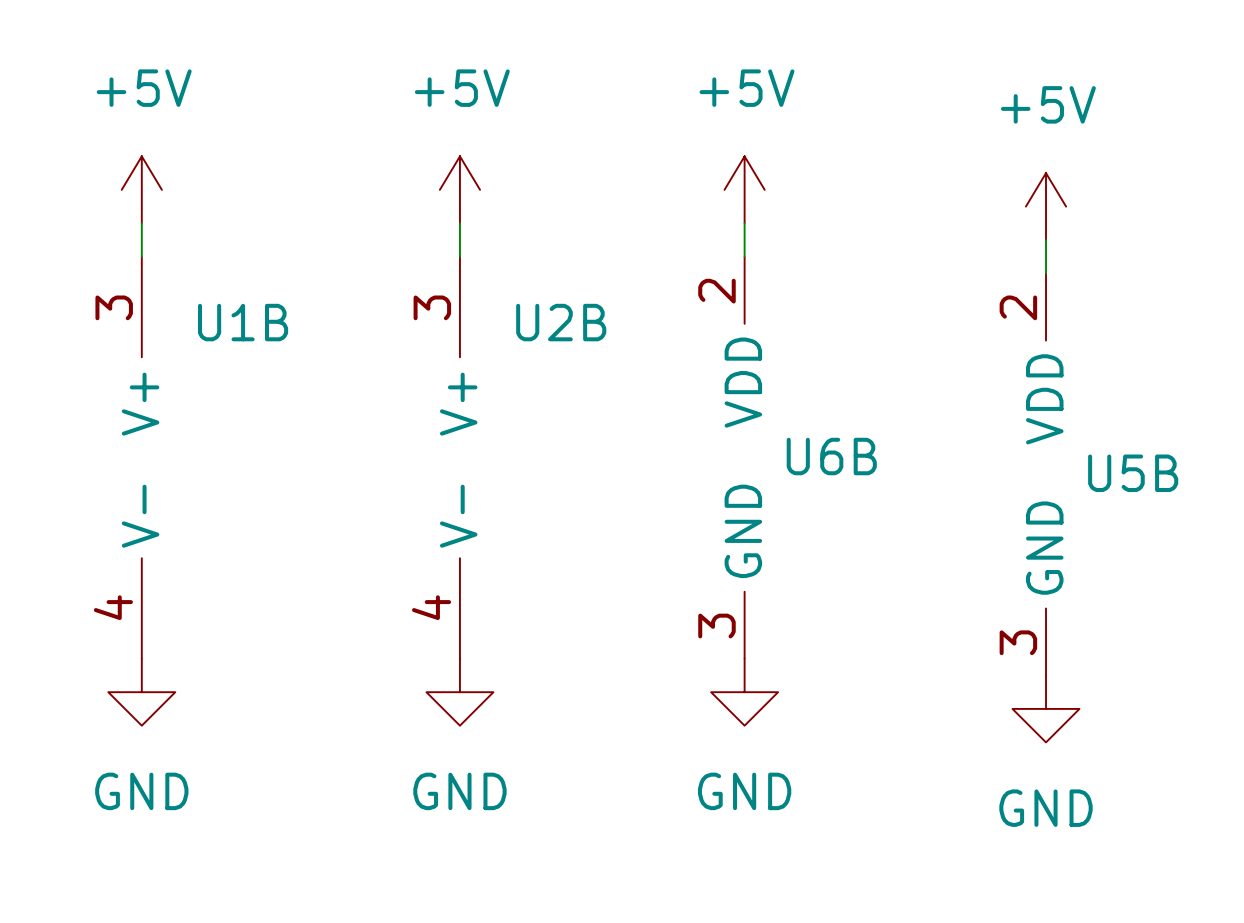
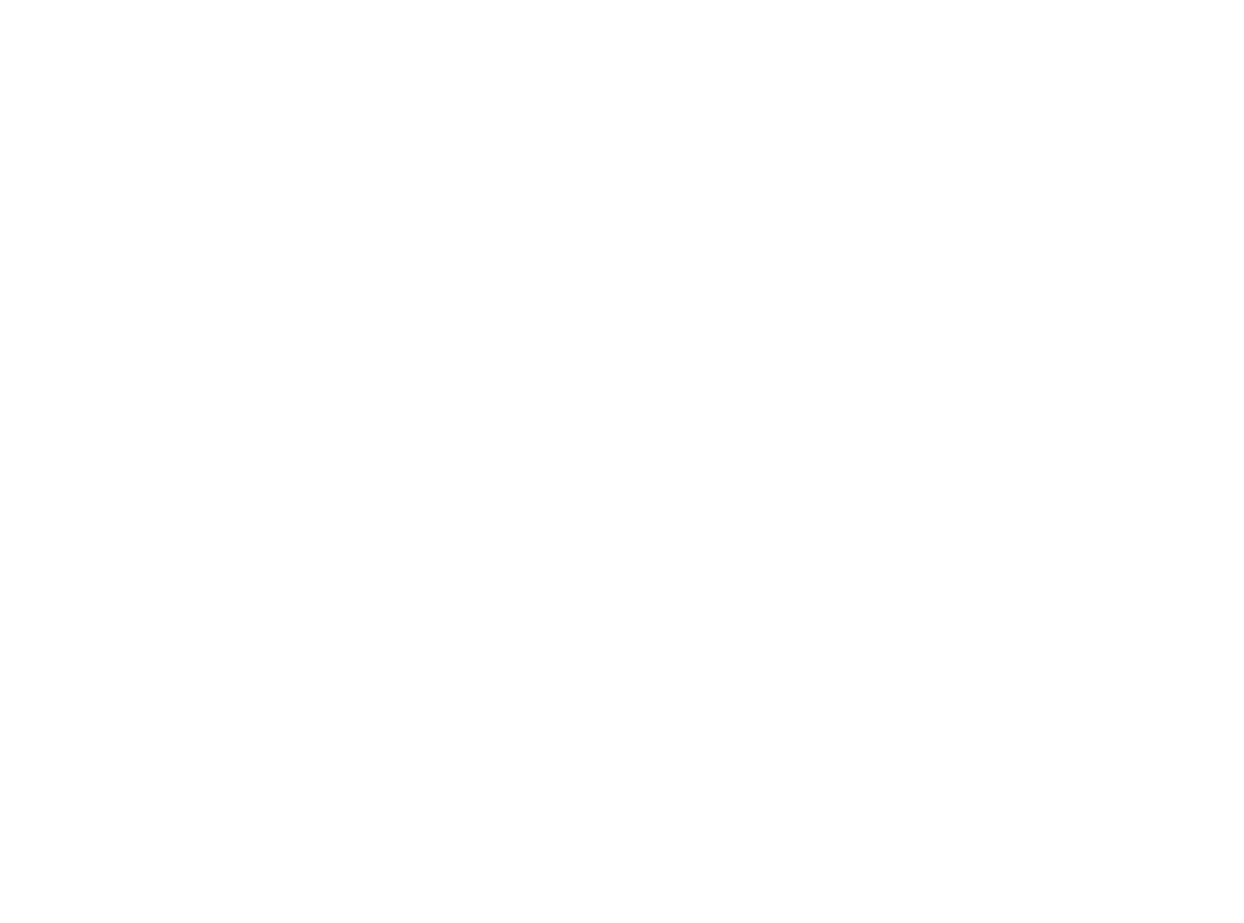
power symbol: +5V (141, 189) -> none
power symbol: +5V (459, 189) -> none
power symbol: +5V (744, 189) -> none
power symbol: +5V (1046, 206) -> none
wire: (141, 223) (141, 256) -> none
wire: (459, 223) (459, 256) -> none
wire: (744, 223) (744, 256) -> none
wire: (1046, 240) (1046, 273) -> none
U1B: (141, 457) -> none
U2B: (459, 457) -> none
U6B: (744, 457) -> none
U5B: (1046, 474) -> none
power symbol: GND (141, 692) -> none
power symbol: GND (459, 692) -> none
power symbol: GND (744, 692) -> none
power symbol: GND (1046, 708) -> none

